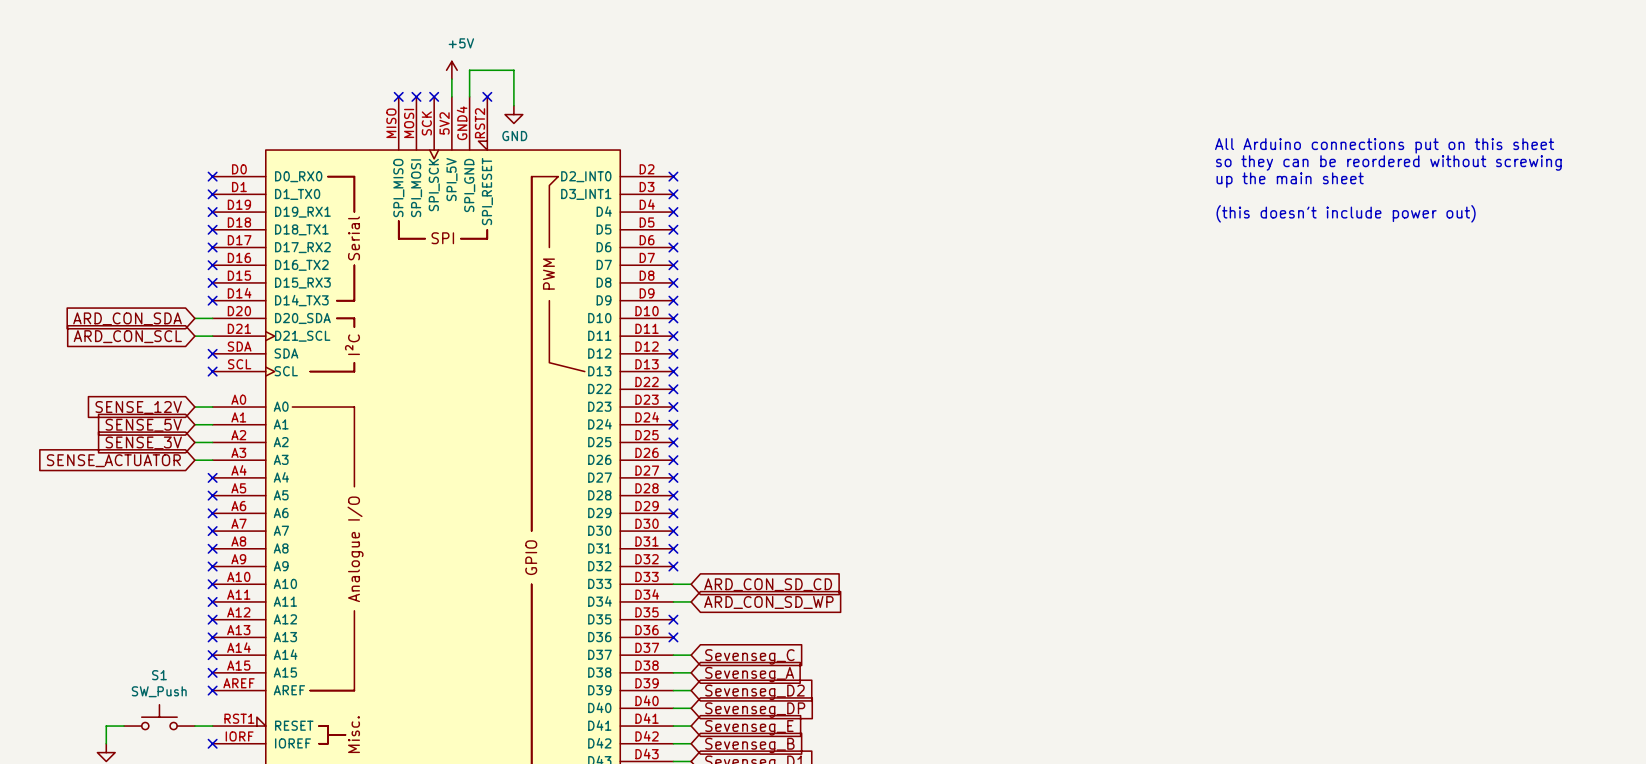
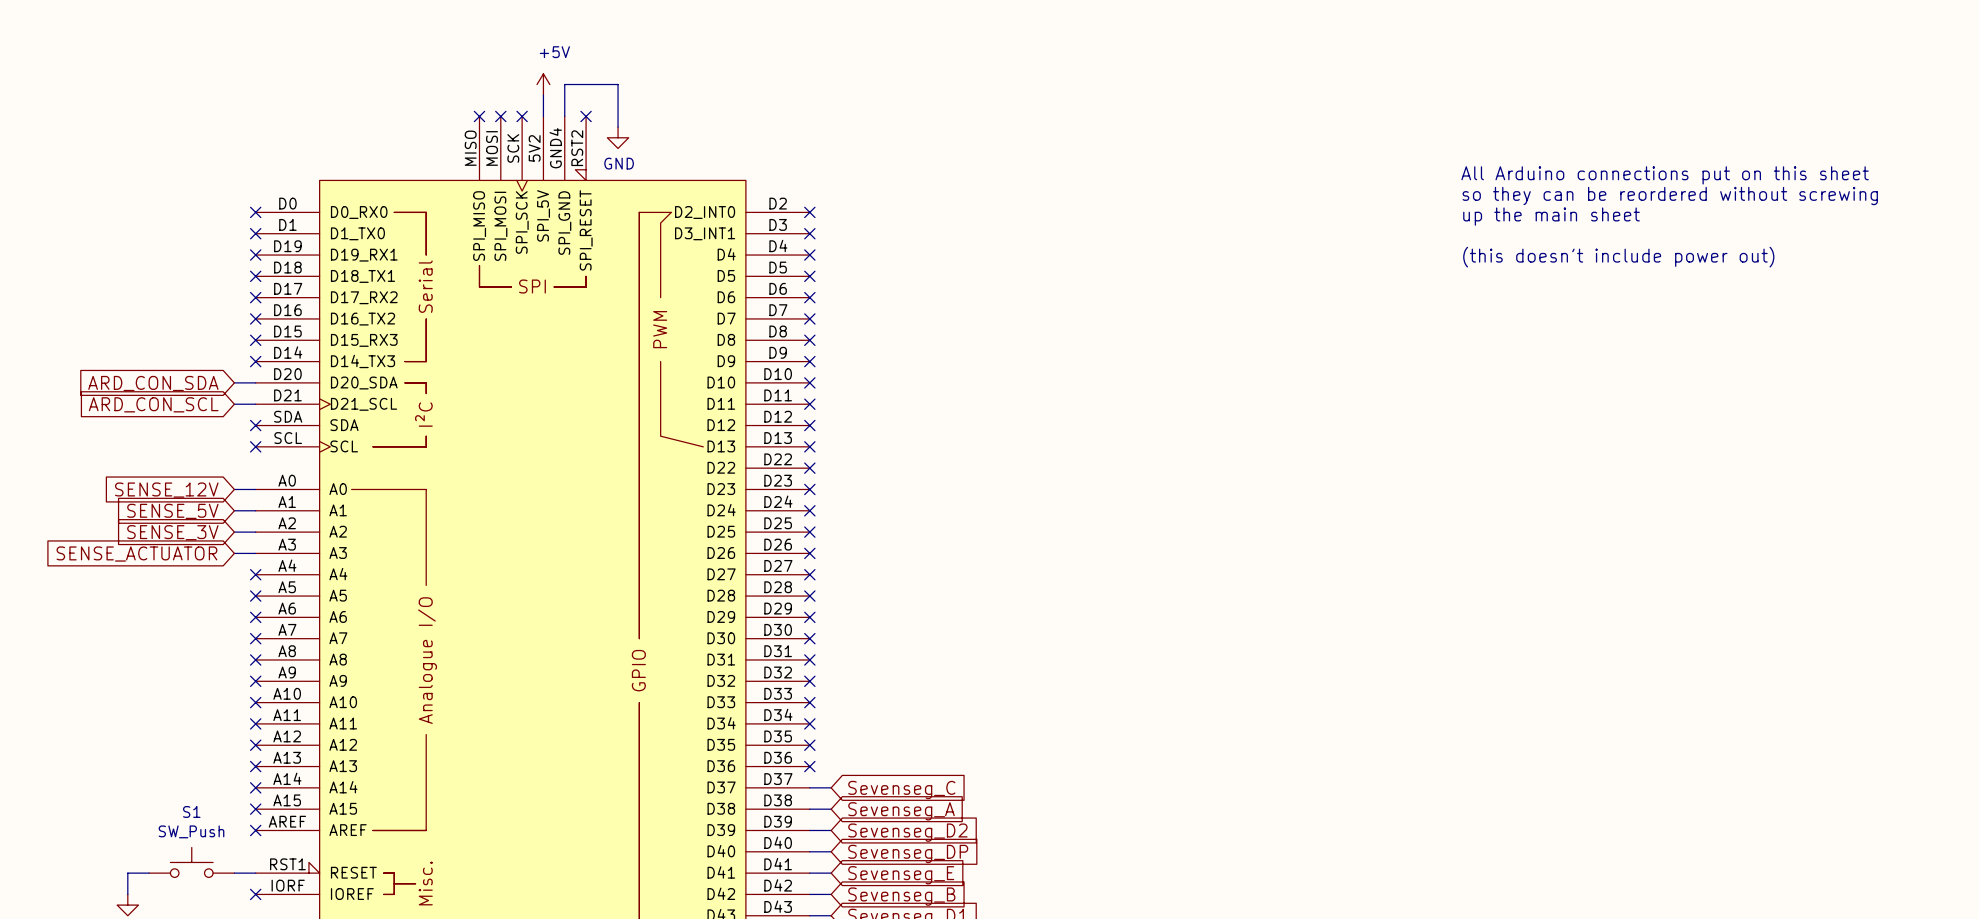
wire: (673, 584) (691, 584) -> none
no-connect mark: none -> (809, 702)
global label: ARD_CON_SD_CD (768, 584) -> none
wire: (673, 601) (691, 601) -> none
no-connect mark: none -> (809, 723)
global label: ARD_CON_SD_WP (768, 602) -> none

